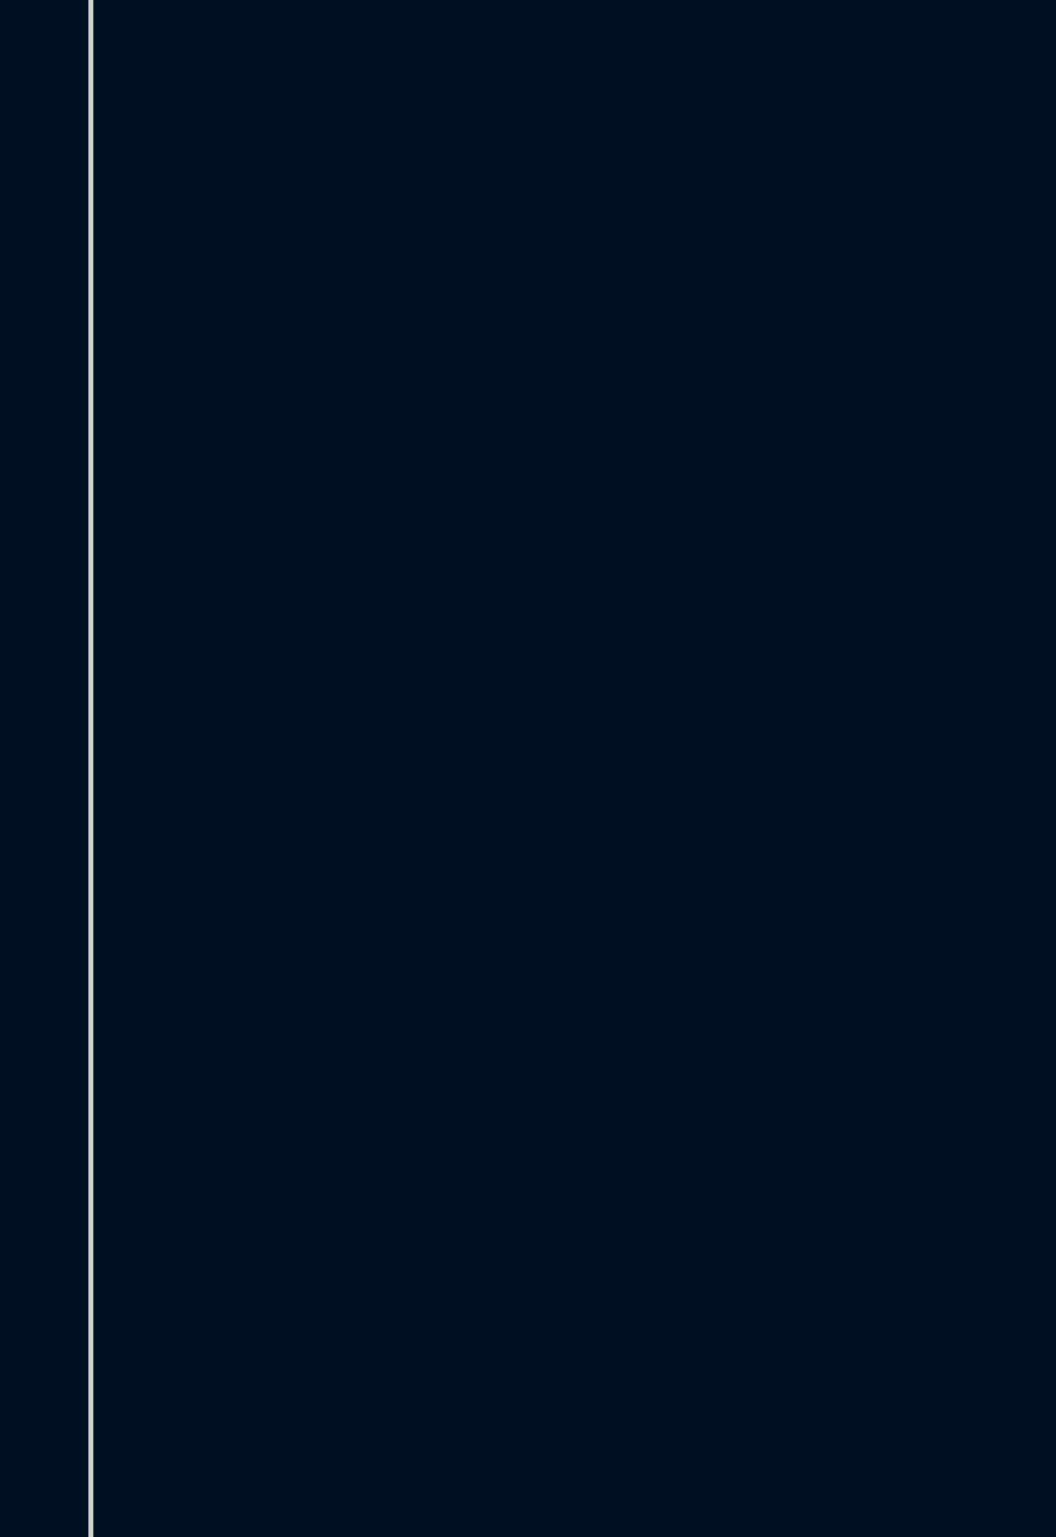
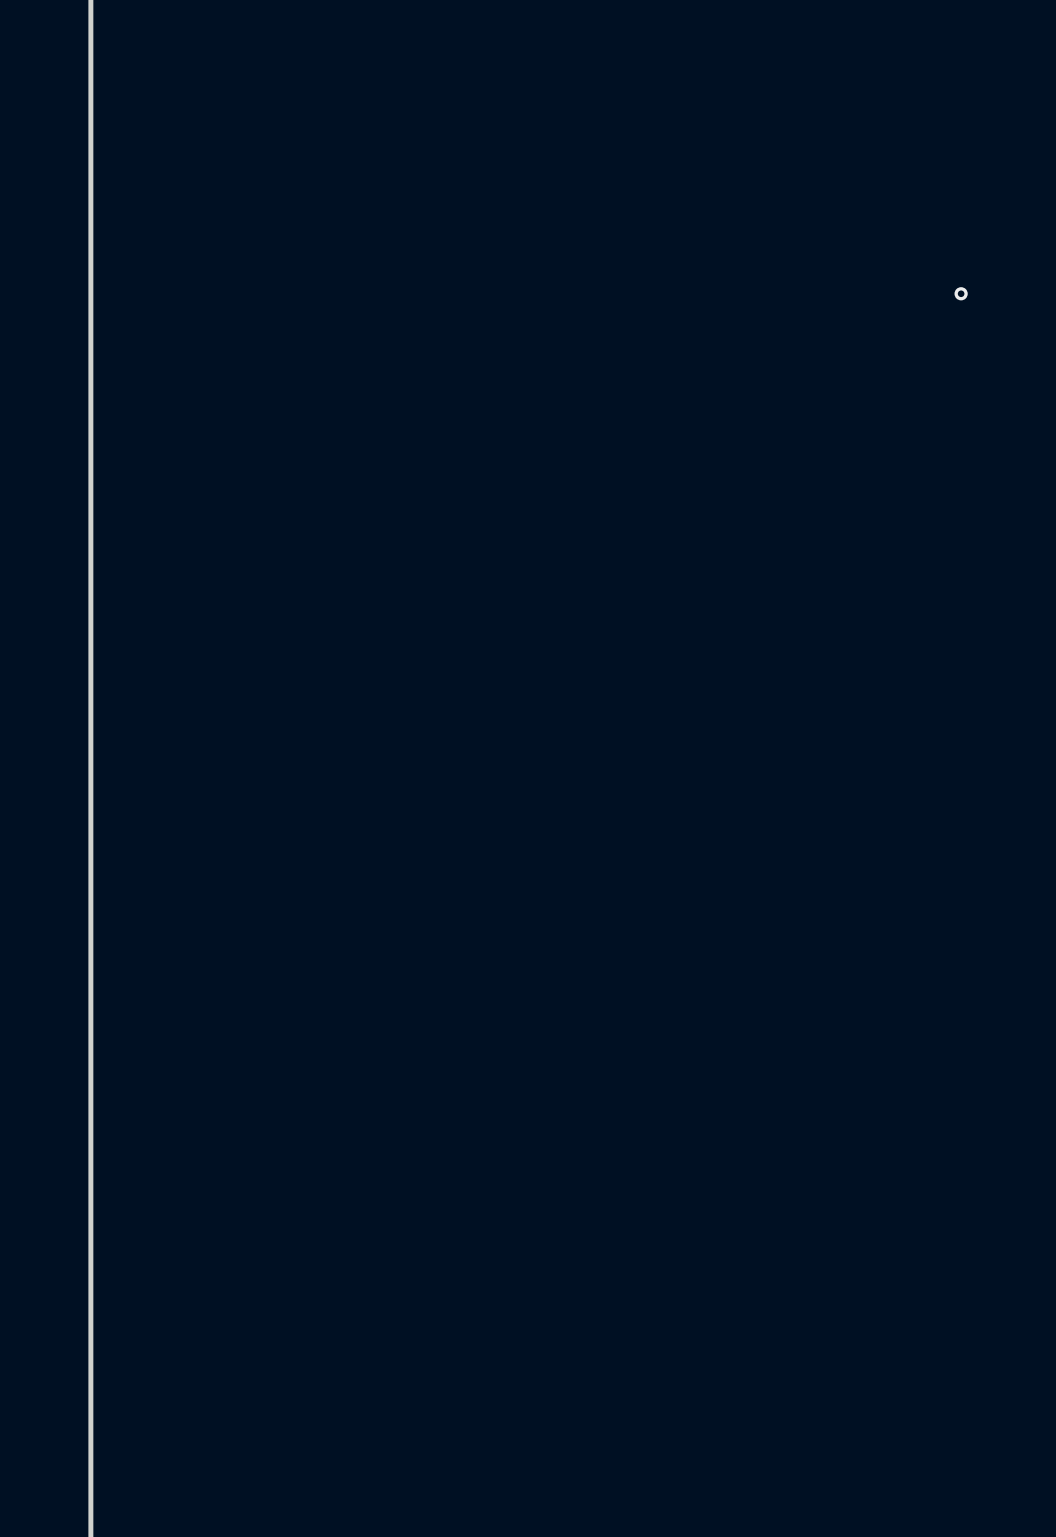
via: none -> (961, 293)

